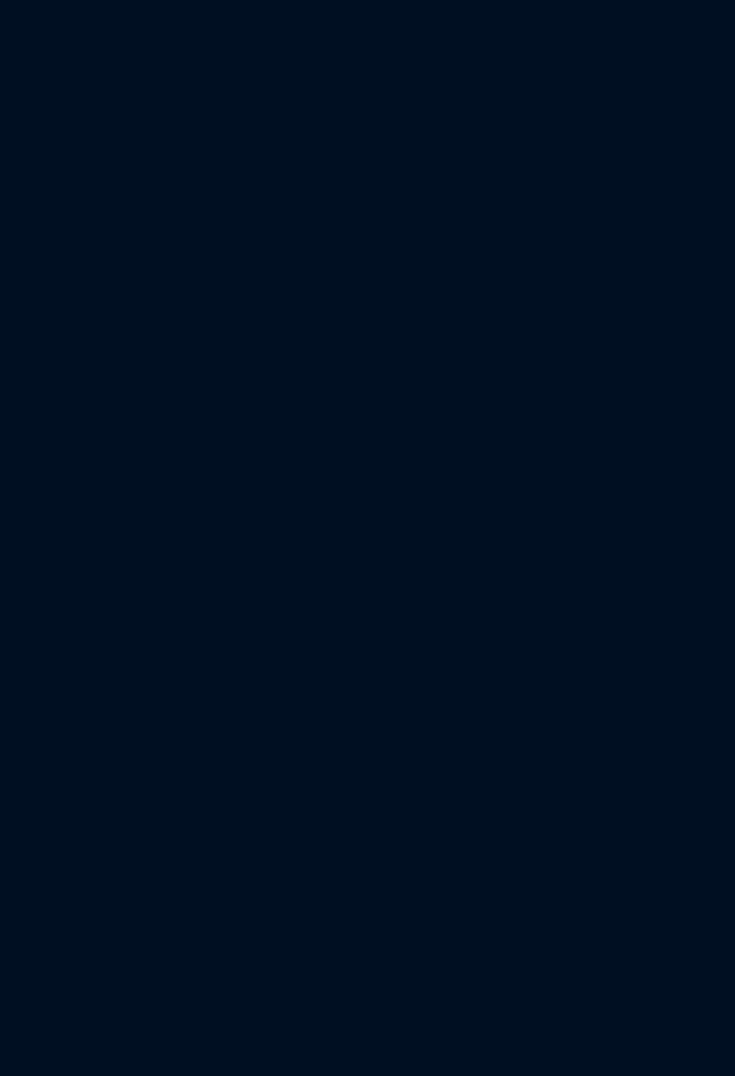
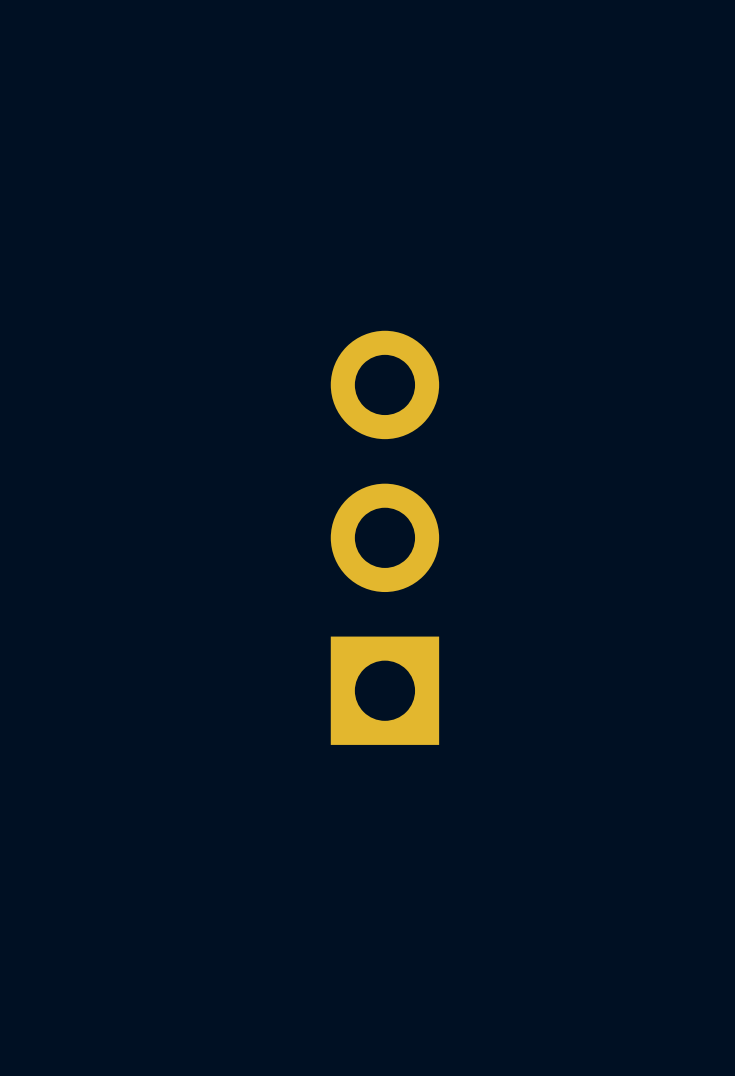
part: none -> (384, 537)

